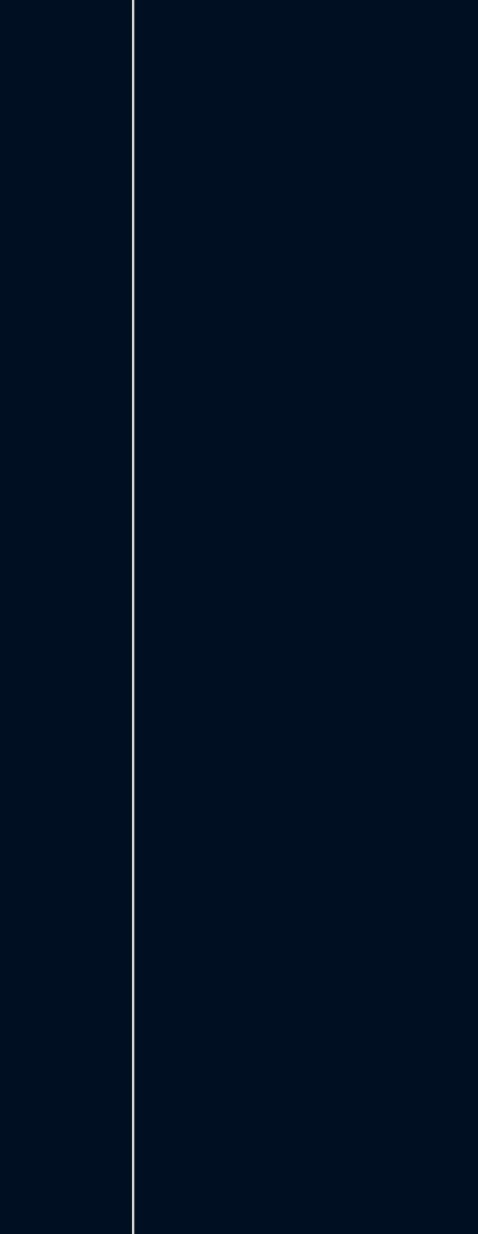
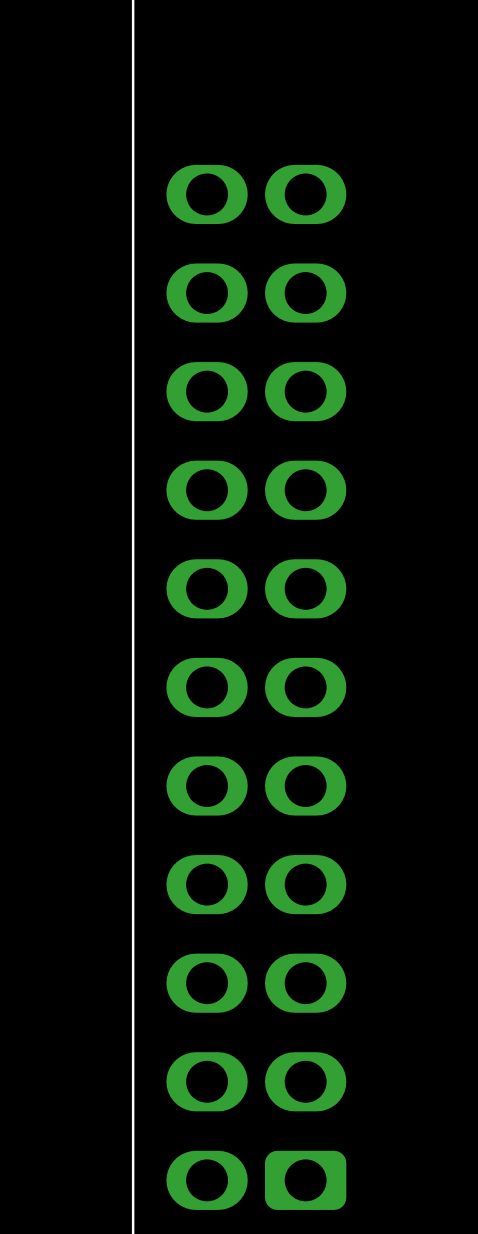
part: none -> (256, 687)

